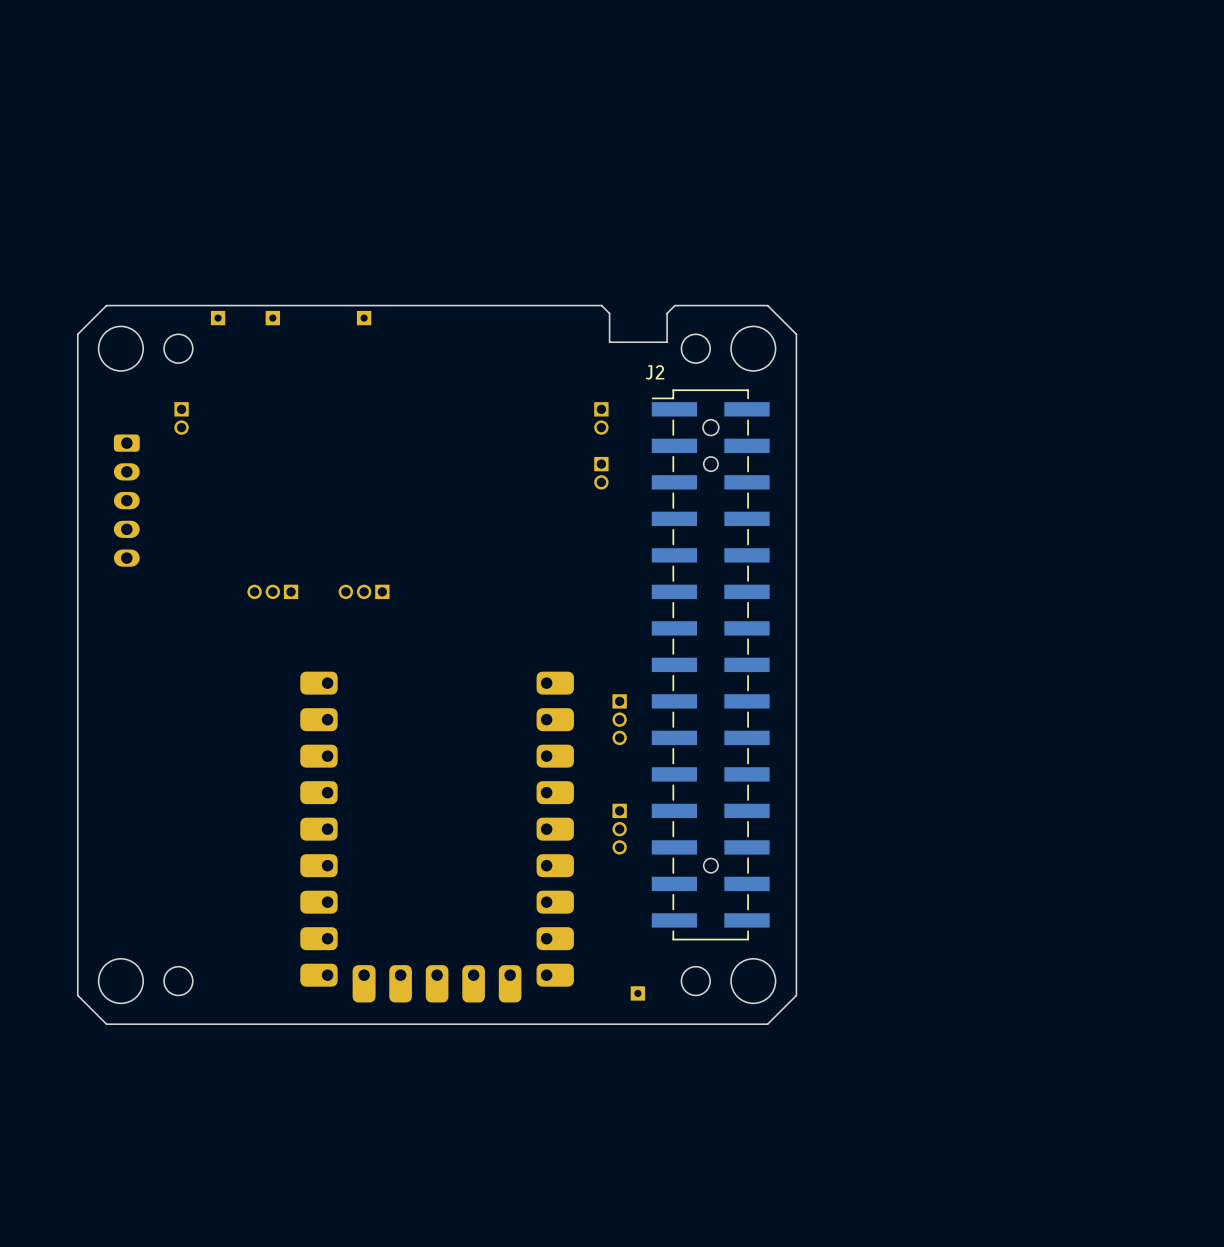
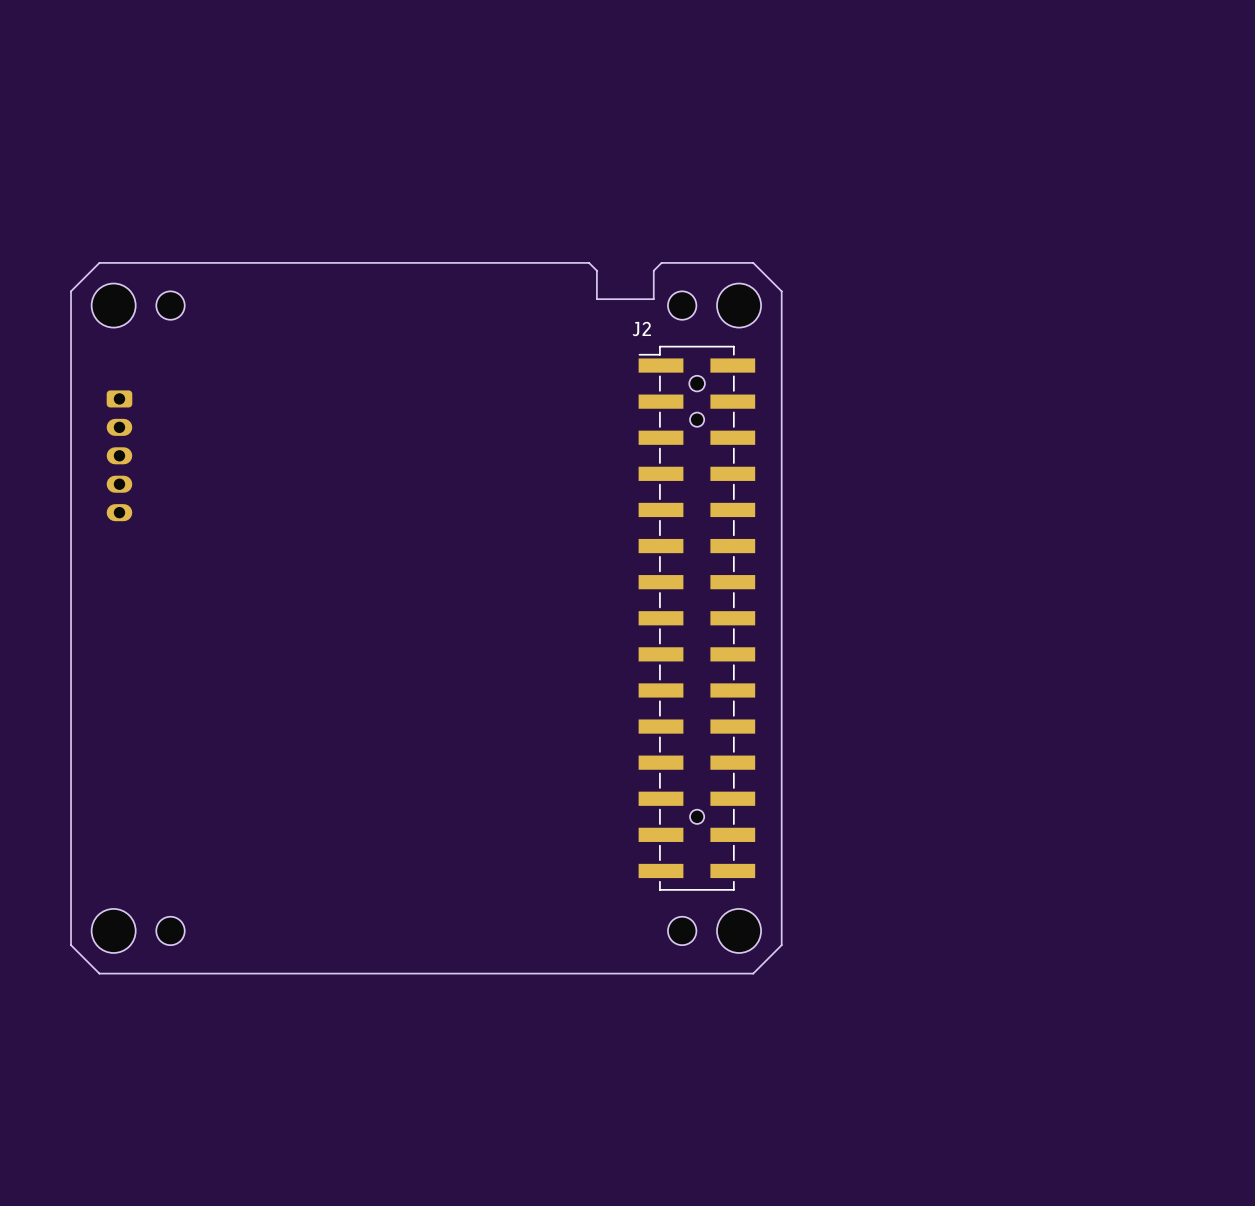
part: (218, 318) -> none
part: (272, 318) -> none
part: (364, 318) -> none
part: (181, 418) -> none
part: (601, 418) -> none
part: (601, 473) -> none
part: (272, 591) -> none
part: (364, 591) -> none
part: (619, 719) -> none
part: (619, 829) -> none
part: (437, 837) -> none
part: (637, 993) -> none

